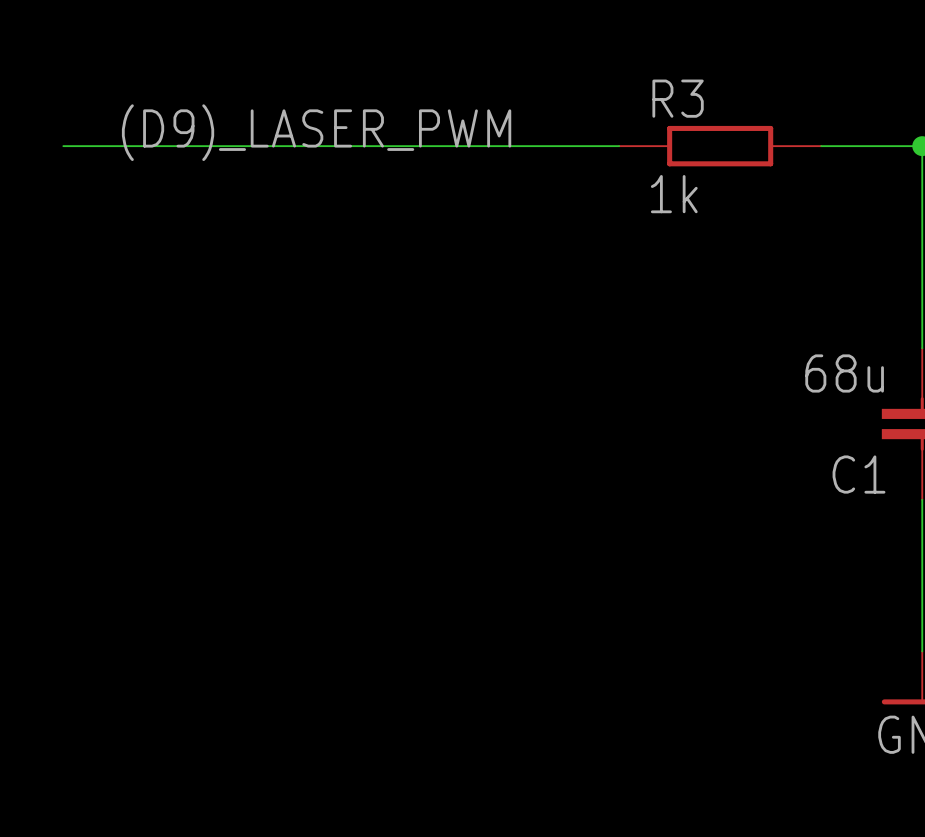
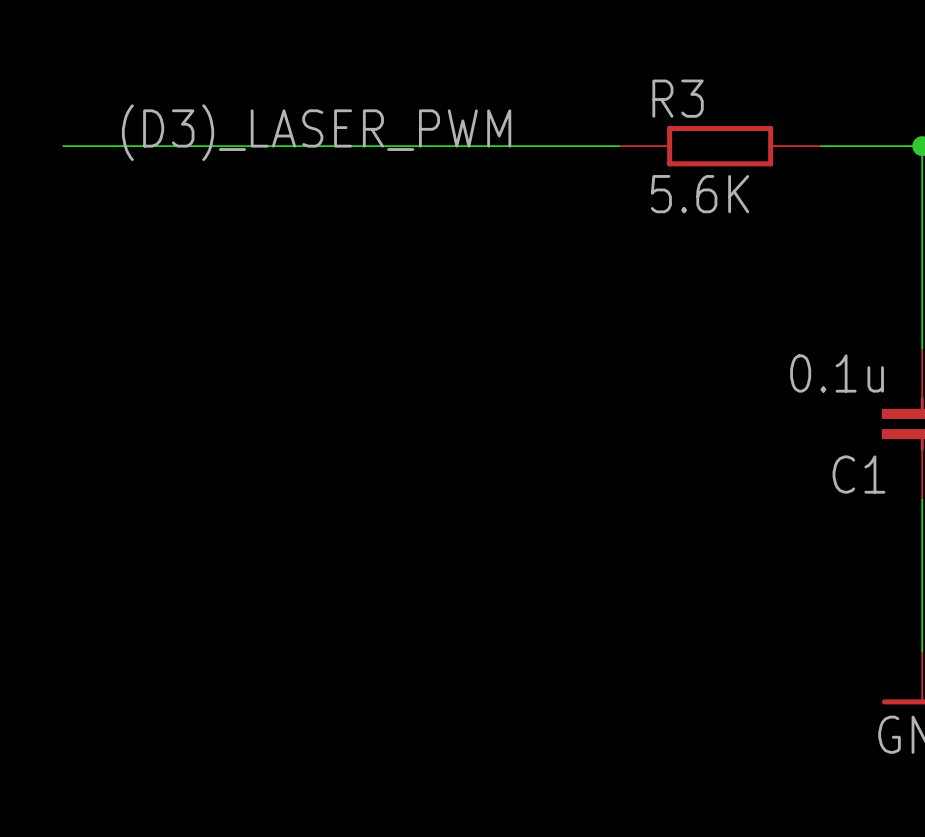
label: (D9)_LASER_PWM (316, 132) -> (D3)_LASER_PWM (316, 132)
R3 value: 1k (674, 194) -> 5.6K (700, 194)
C1 value: 68u (844, 373) -> 0.1u (837, 373)

